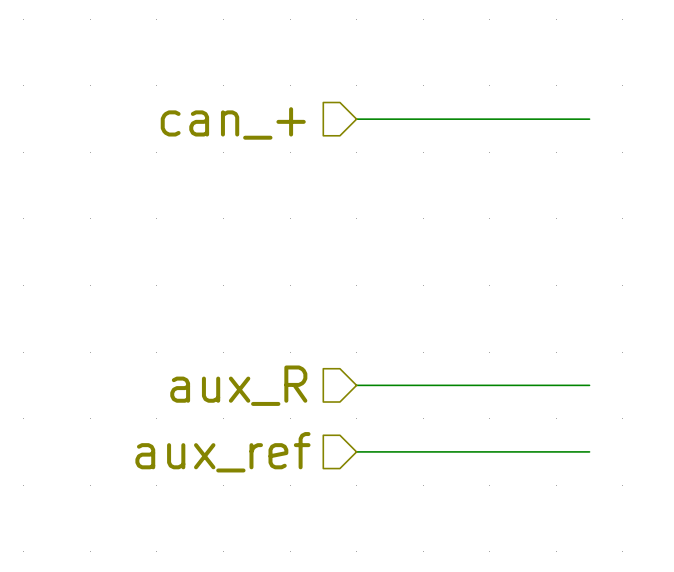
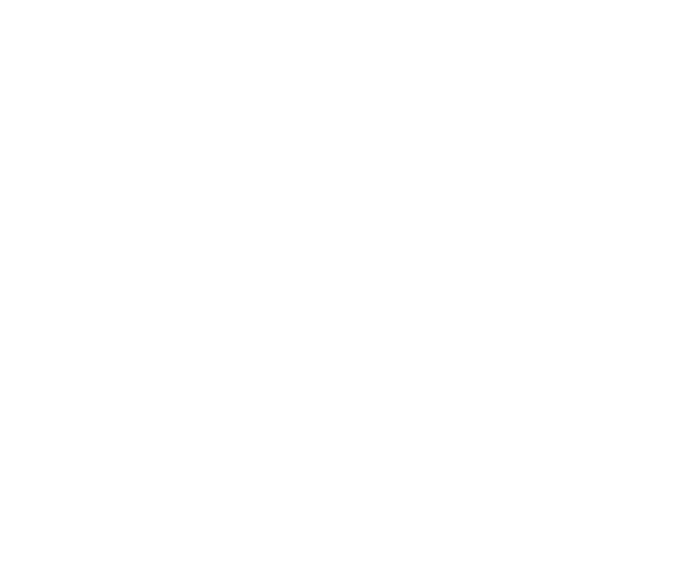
wire: (356, 119) (589, 119) -> none
hierarchical label: can_+ (233, 123) -> none
hierarchical label: aux_R (238, 385) -> none
wire: (356, 385) (589, 385) -> none
wire: (356, 451) (589, 451) -> none
hierarchical label: aux_ref (222, 452) -> none

